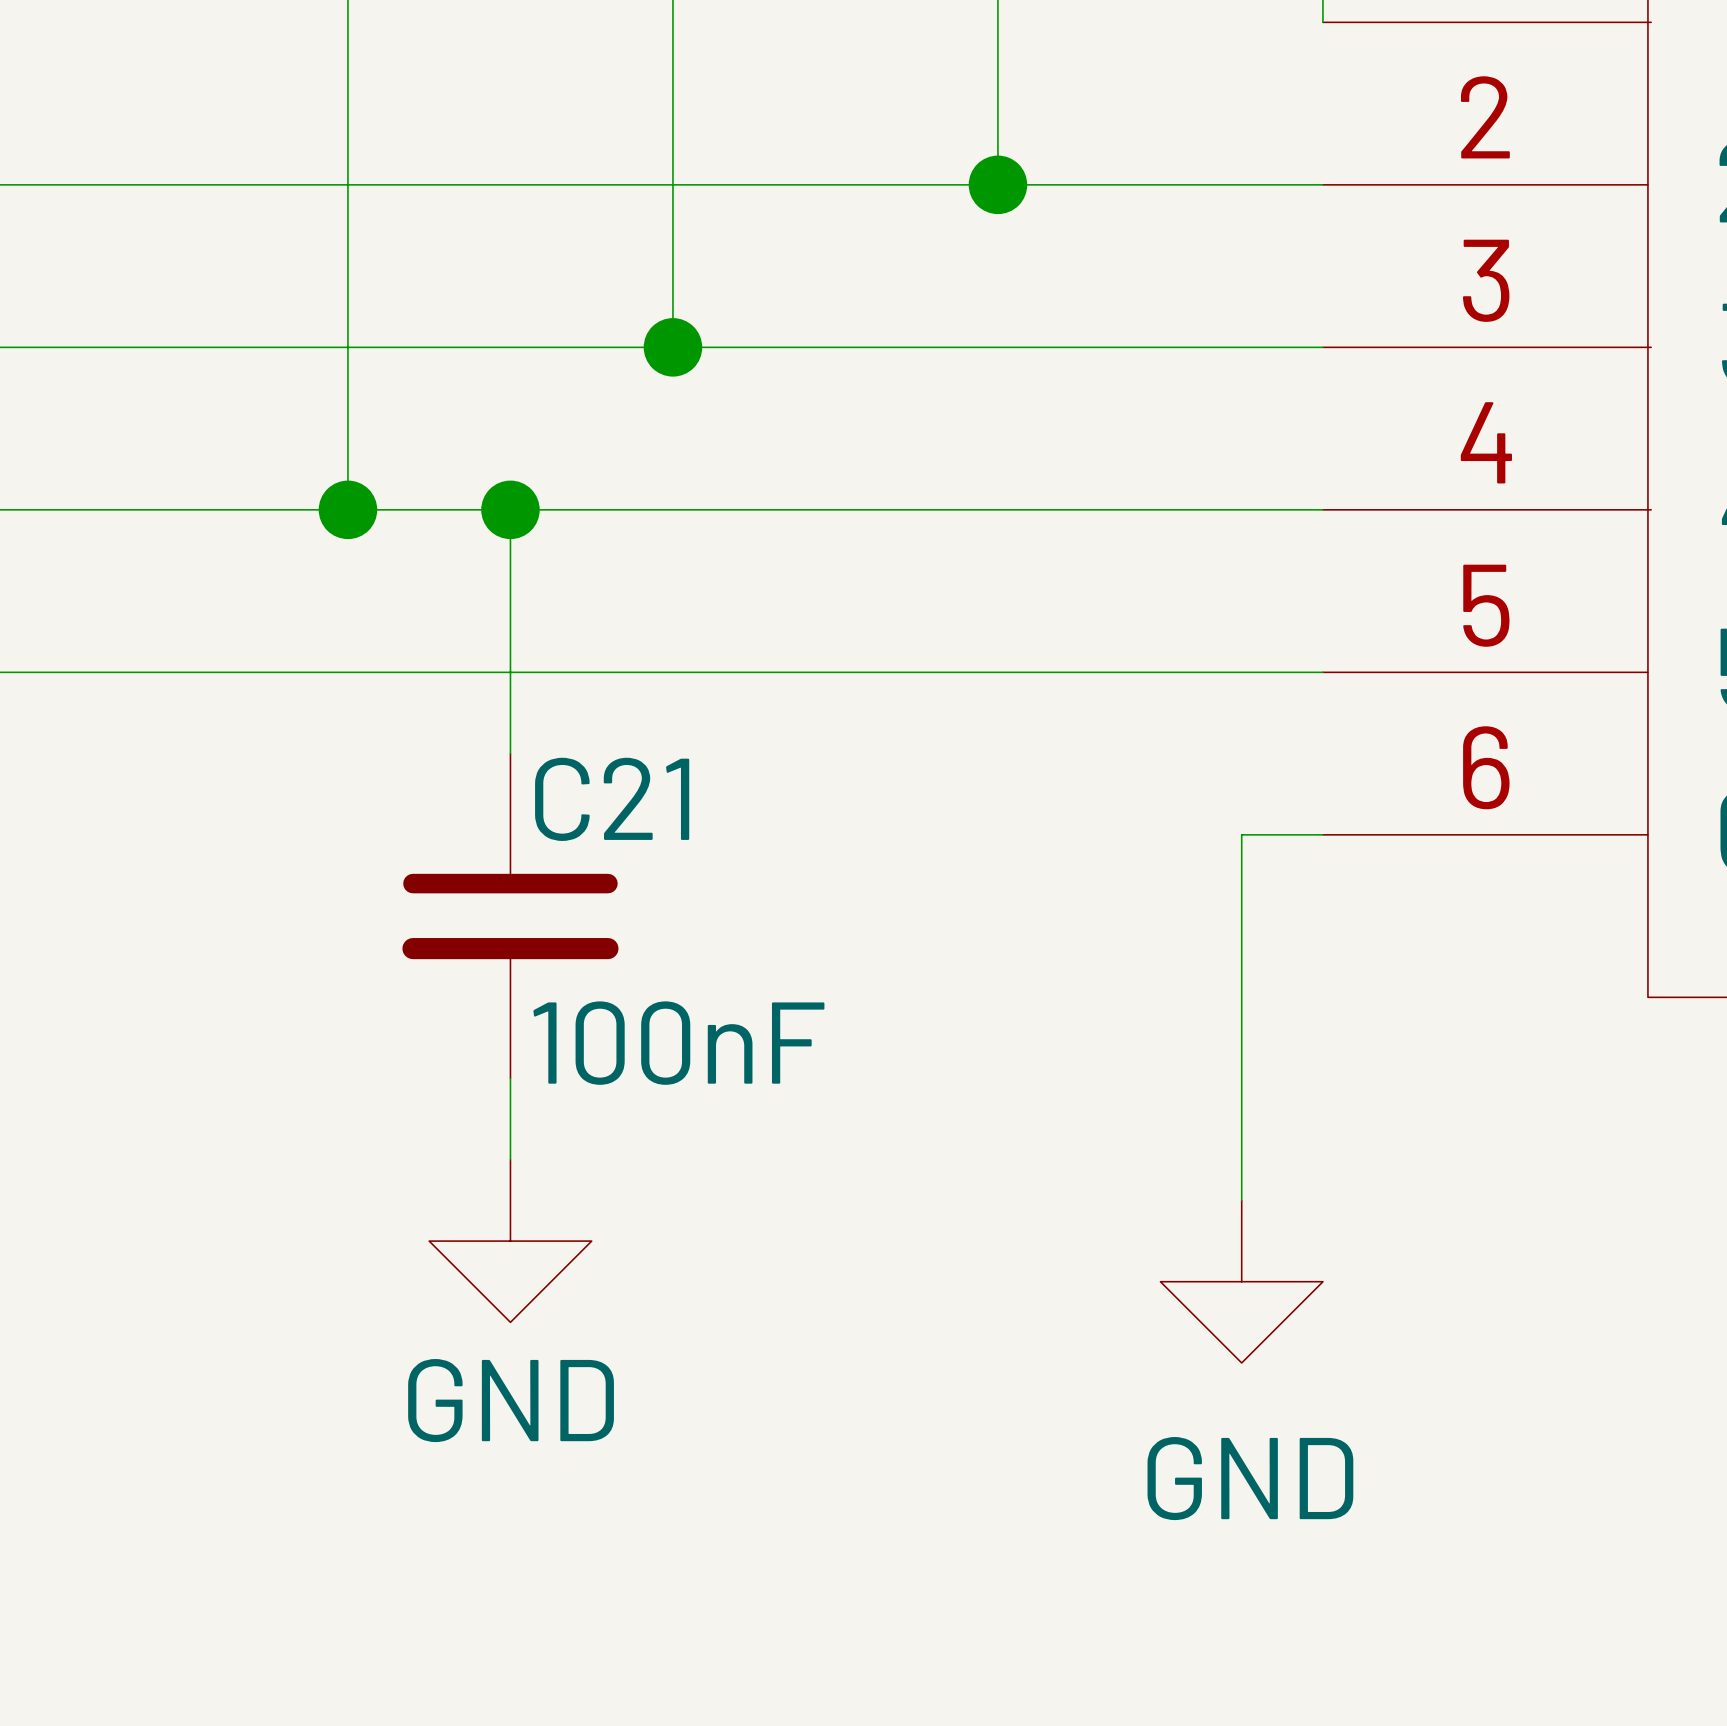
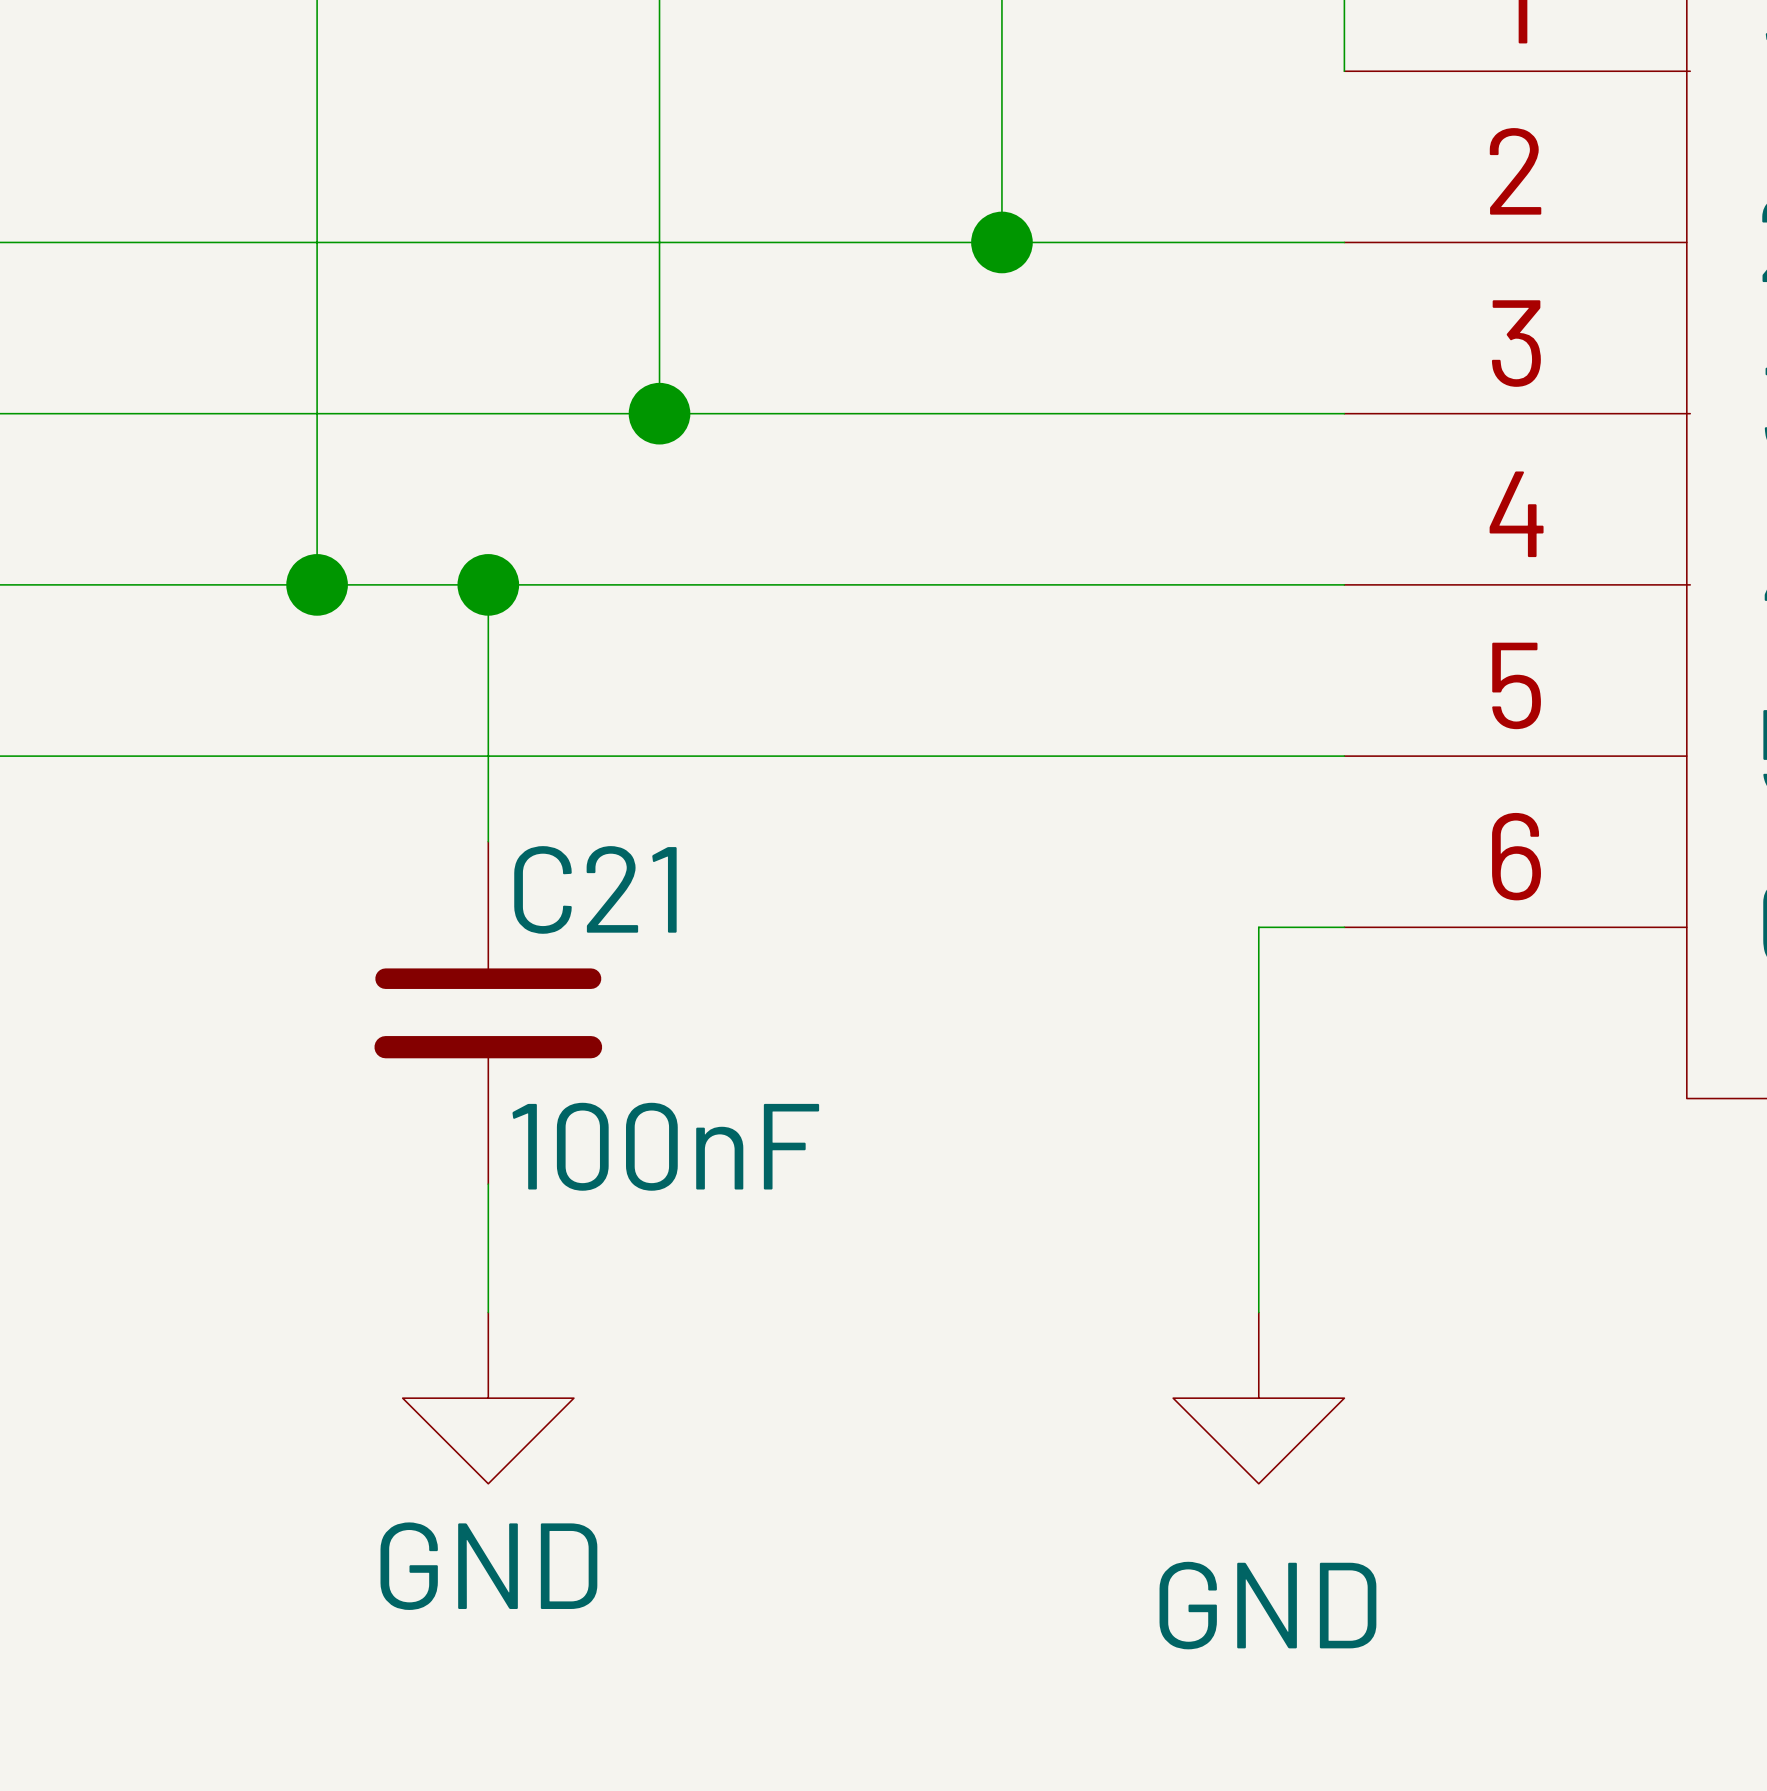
power symbol position: GND (510, 1241) -> GND (488, 1398)

